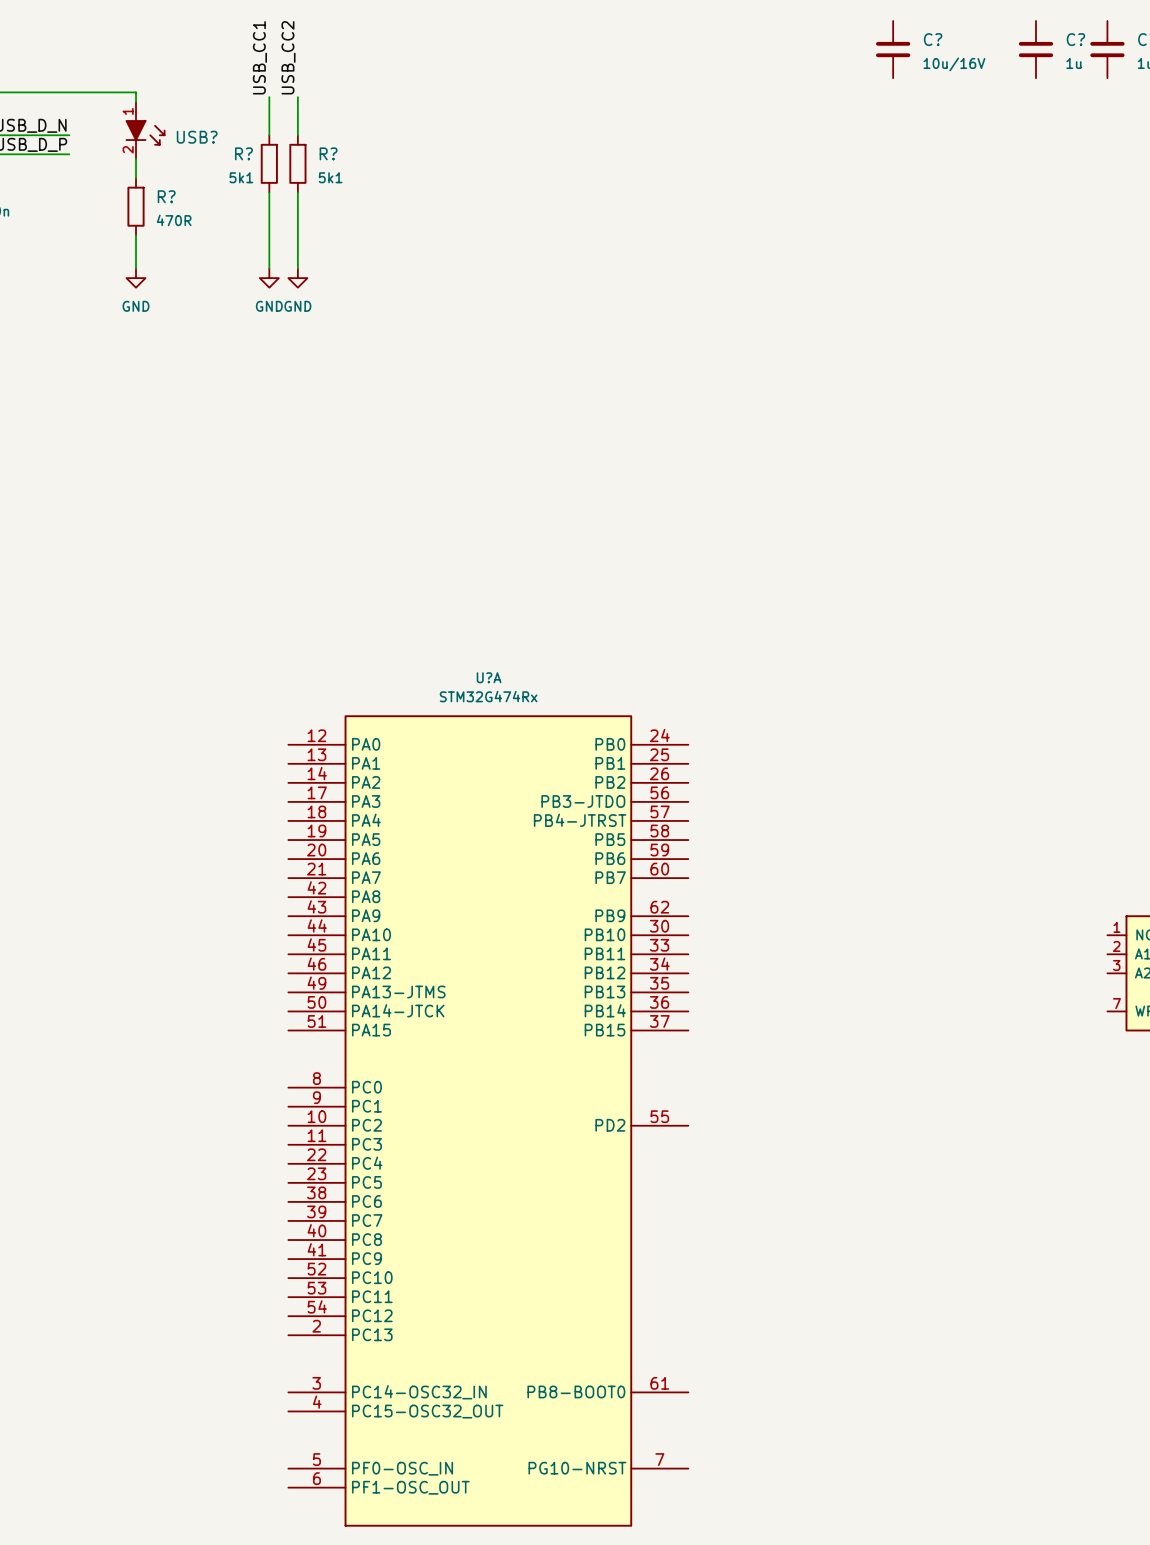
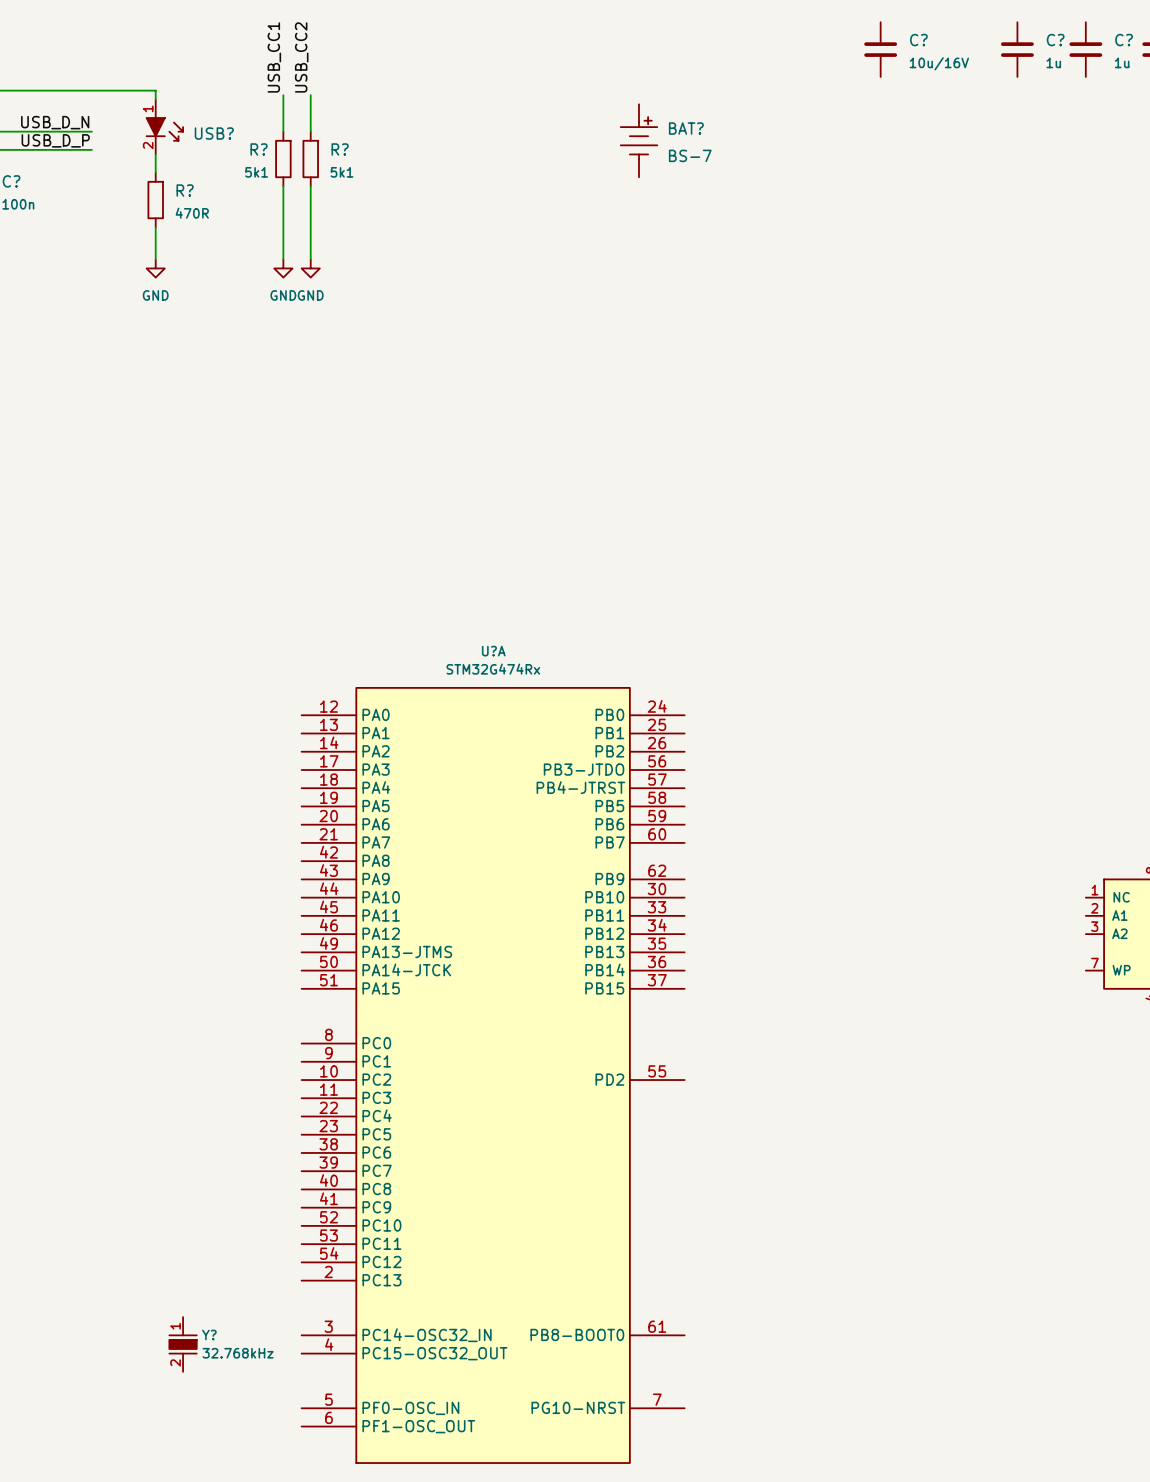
BAT?: none -> BS-7 (639, 140)
Y?: none -> (183, 1344)

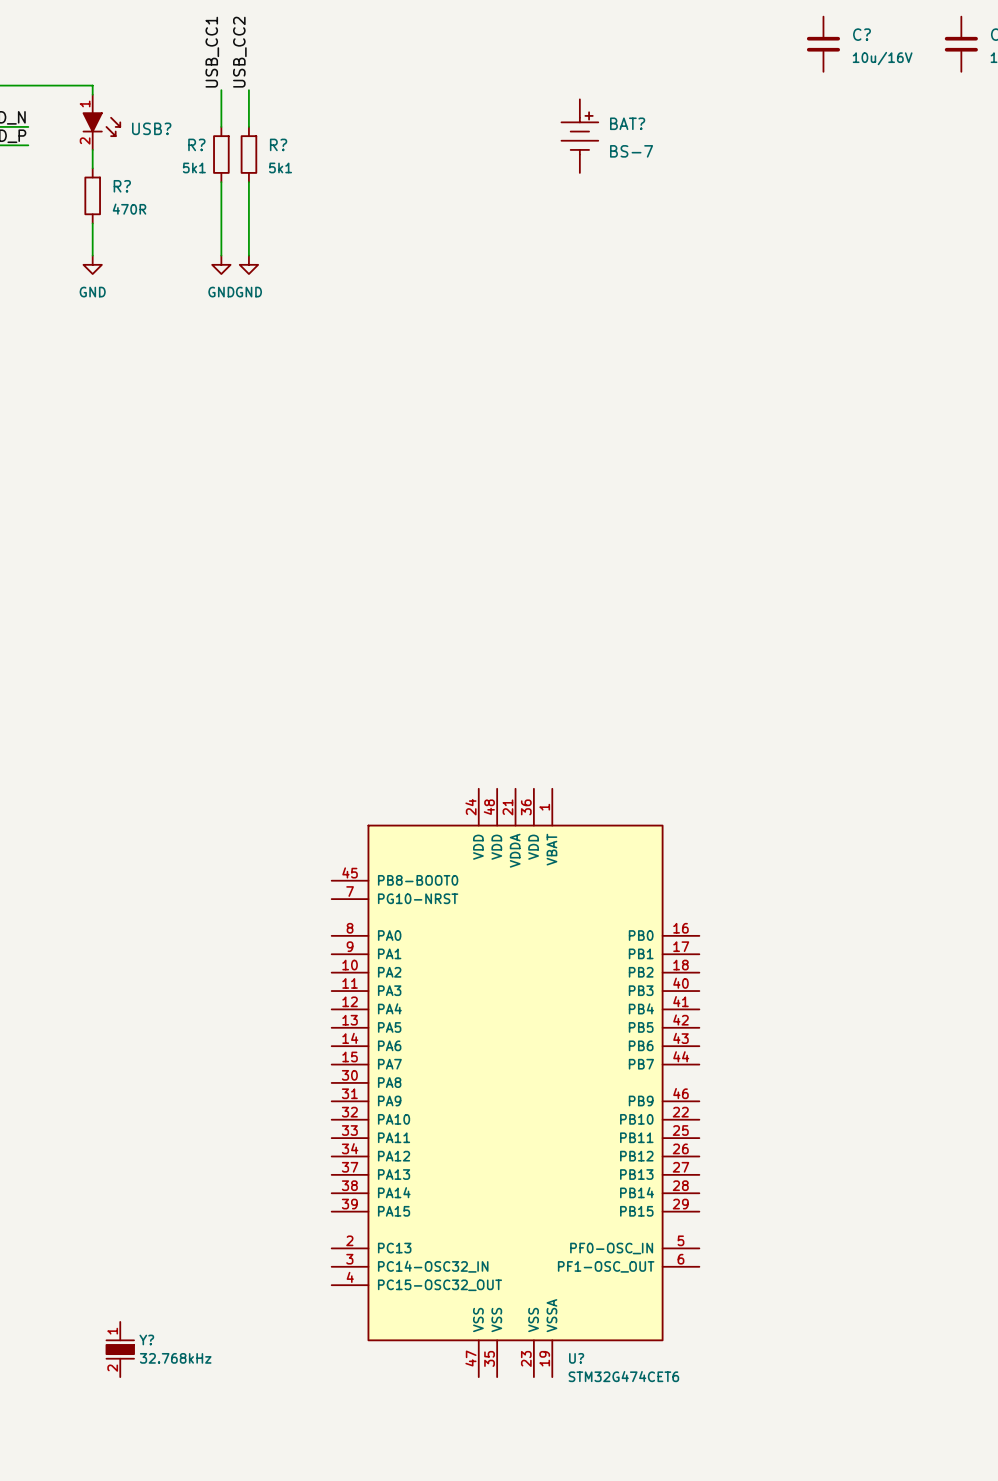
U?A: STM32G474Rx (493, 1075) -> none
U?: none -> STM32G474CET6 (515, 1082)

